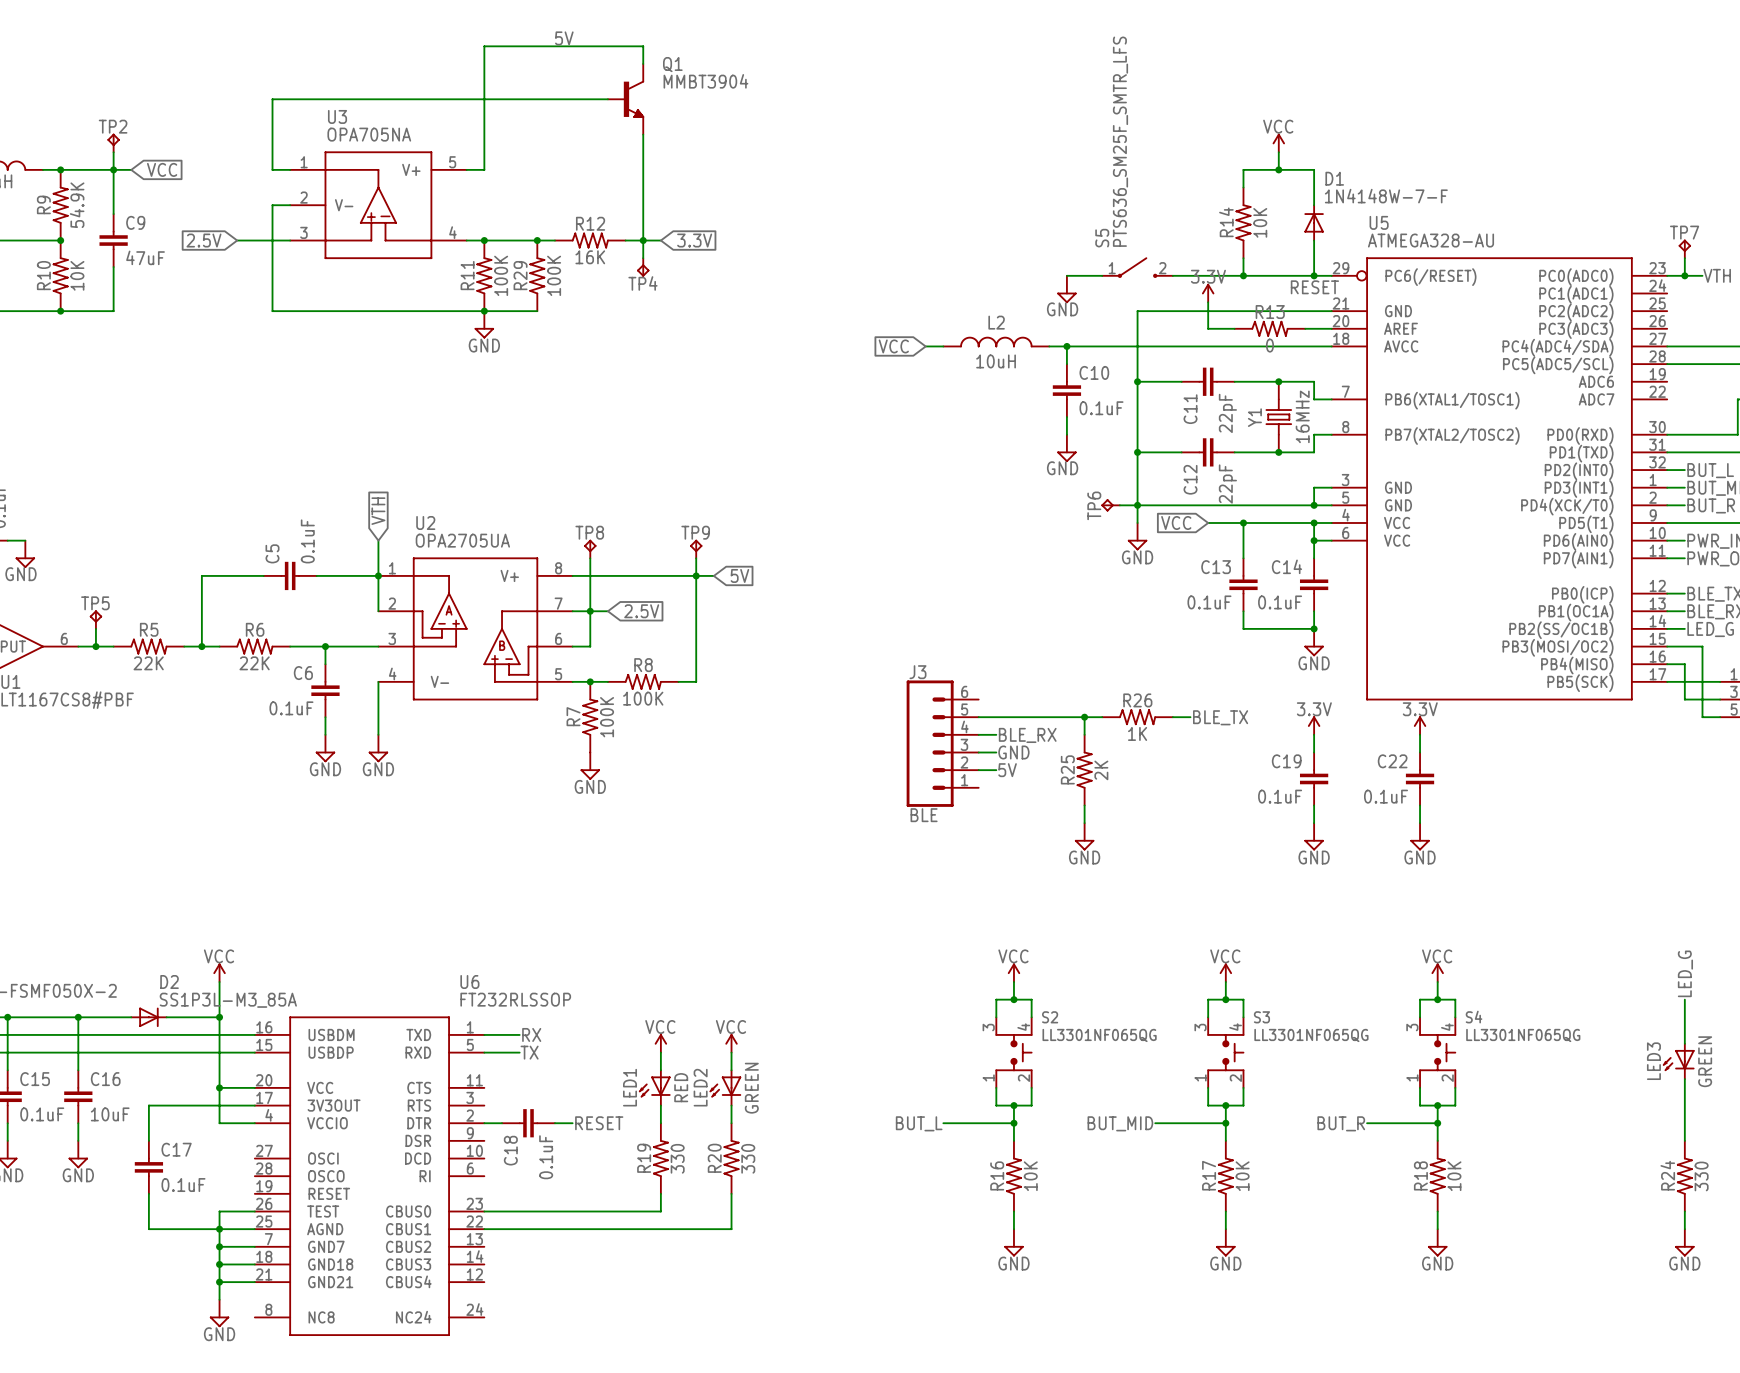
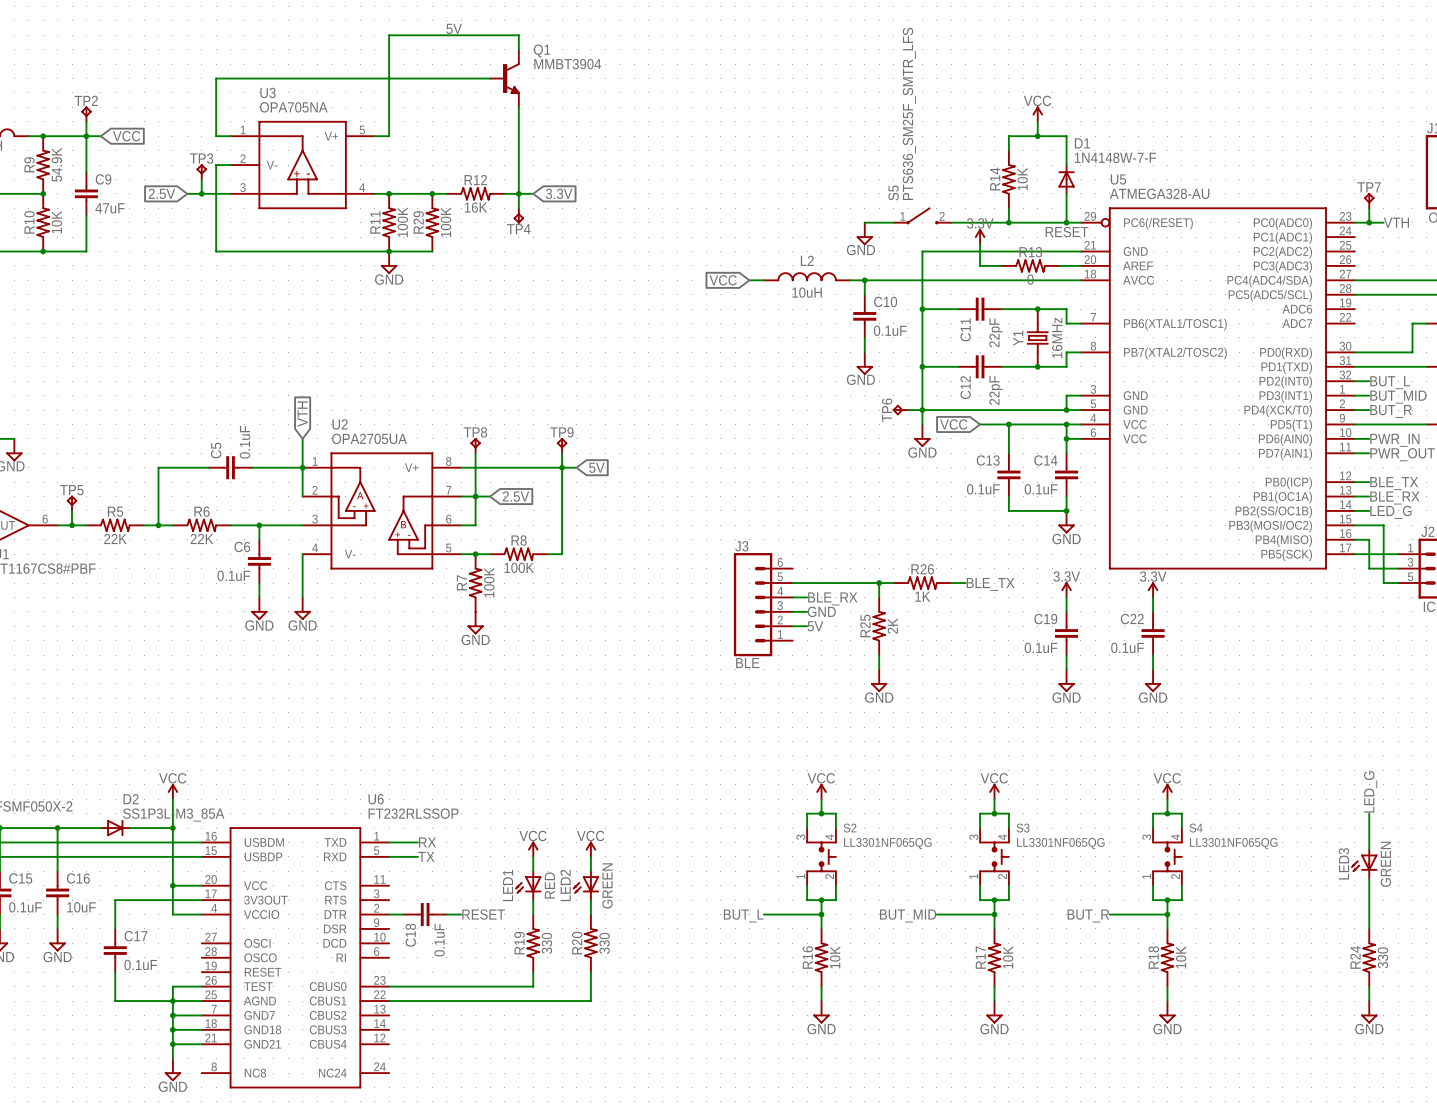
TP3: none -> (201, 171)
wire: none -> (201, 179) (201, 193)
junction: none -> (201, 193)

